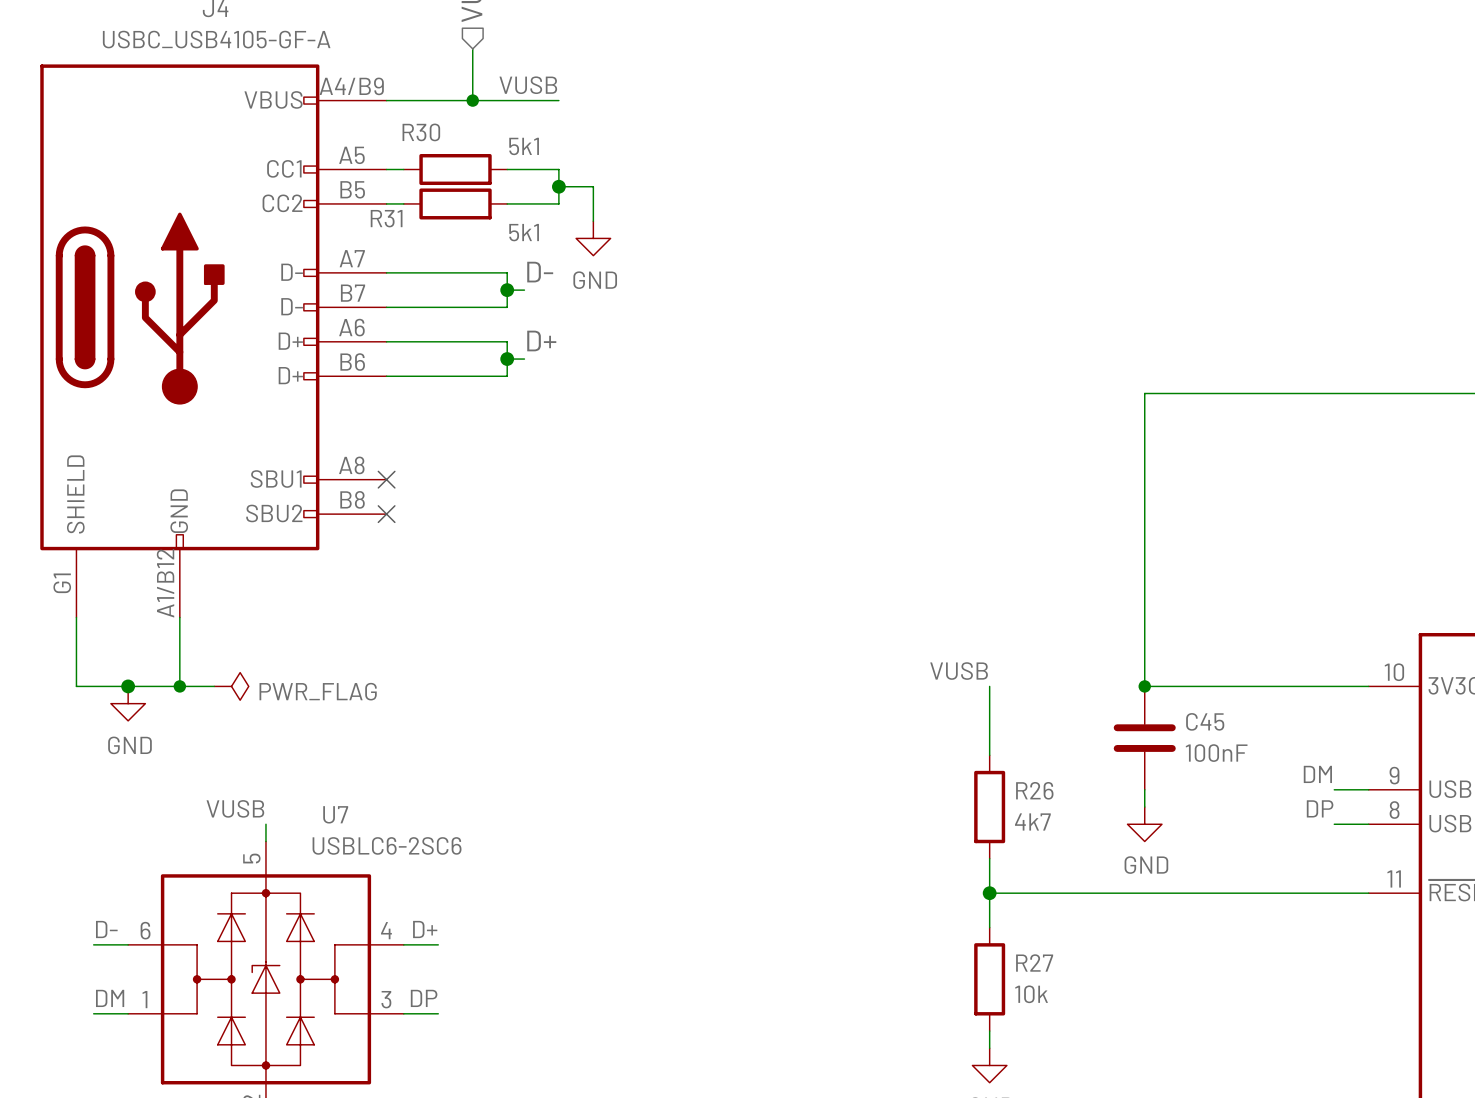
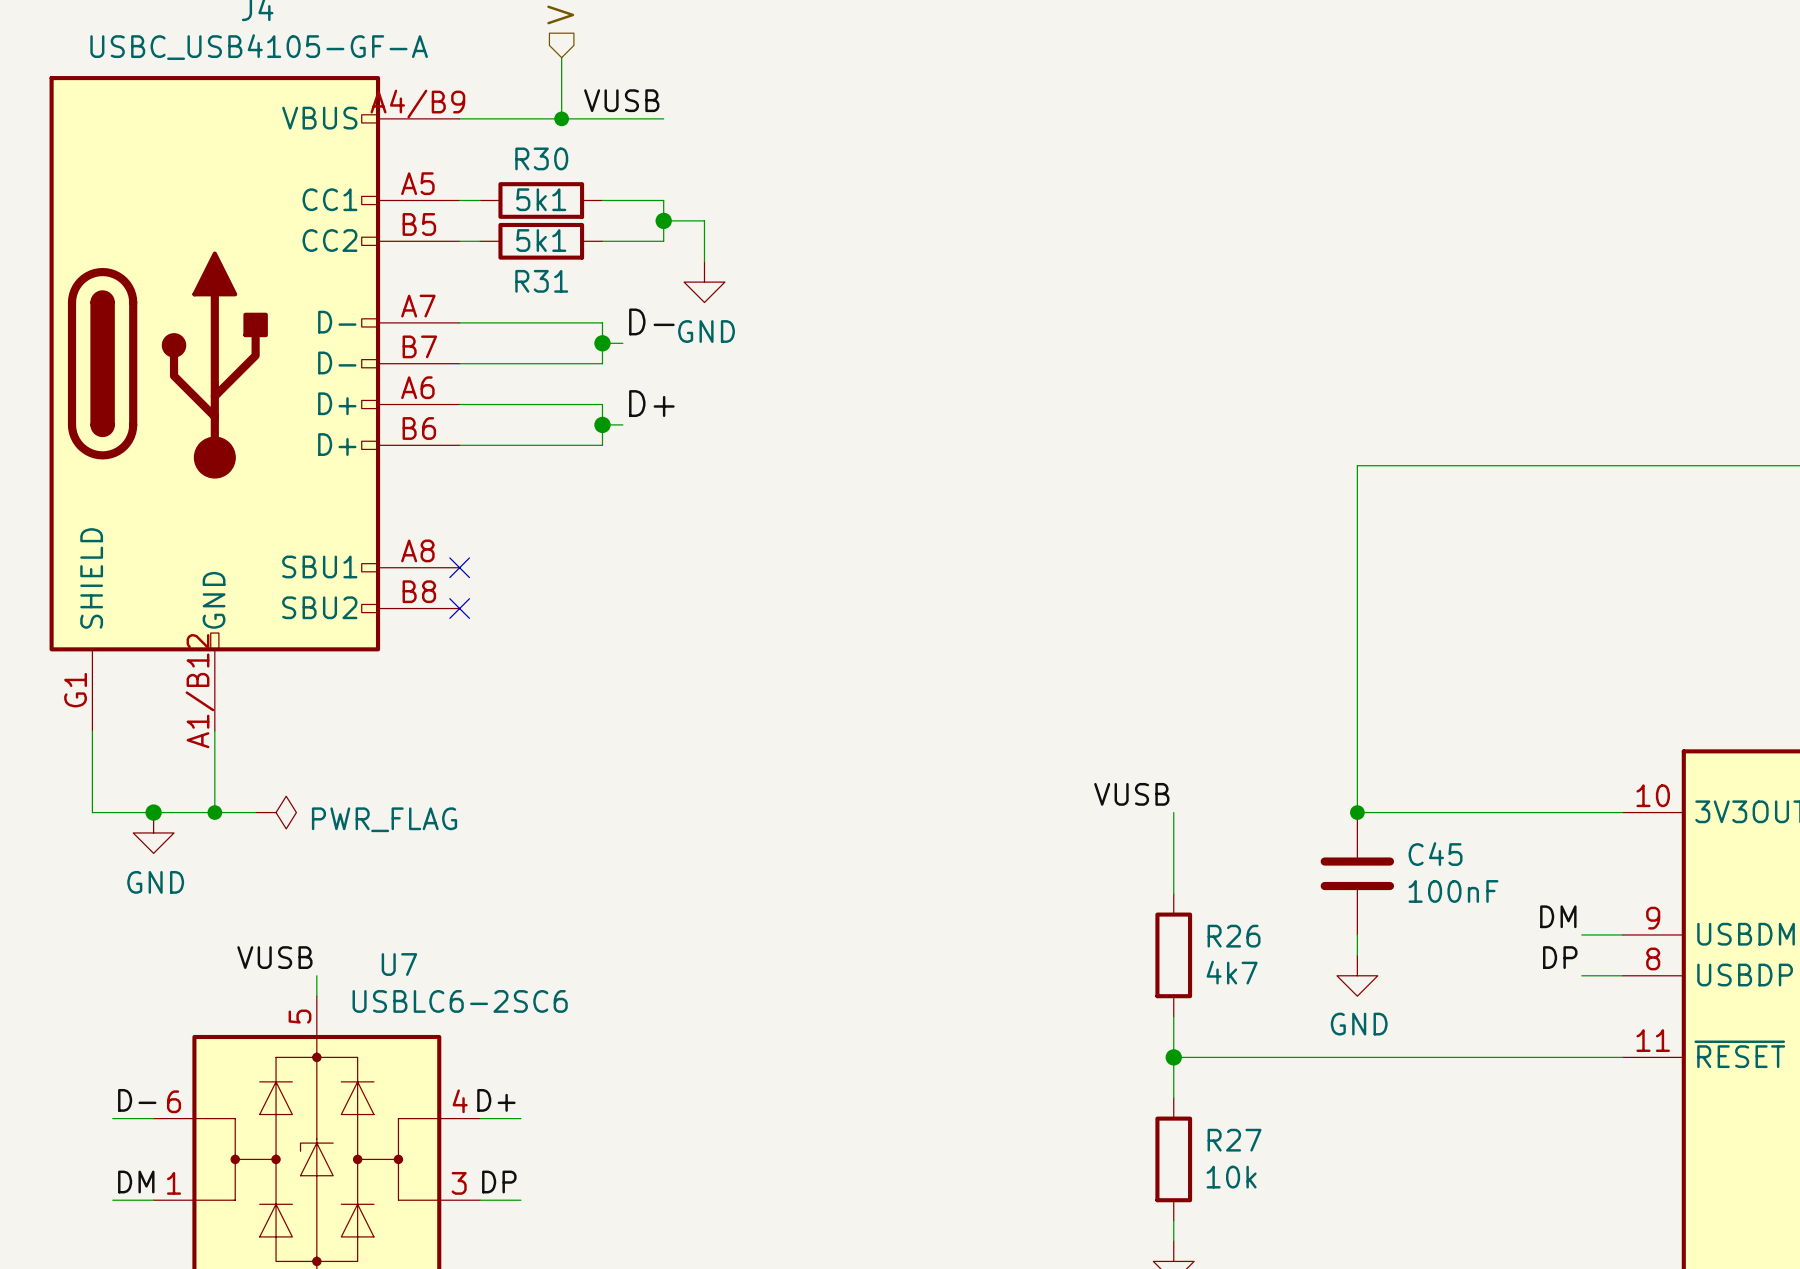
R30 name position: R30 (421, 132) -> R30 (541, 158)
R30 value position: 5k1 (524, 146) -> 5k1 (541, 199)
R31 name position: R31 (386, 218) -> R31 (541, 281)
R31 value position: 5k1 (524, 232) -> 5k1 (541, 240)

